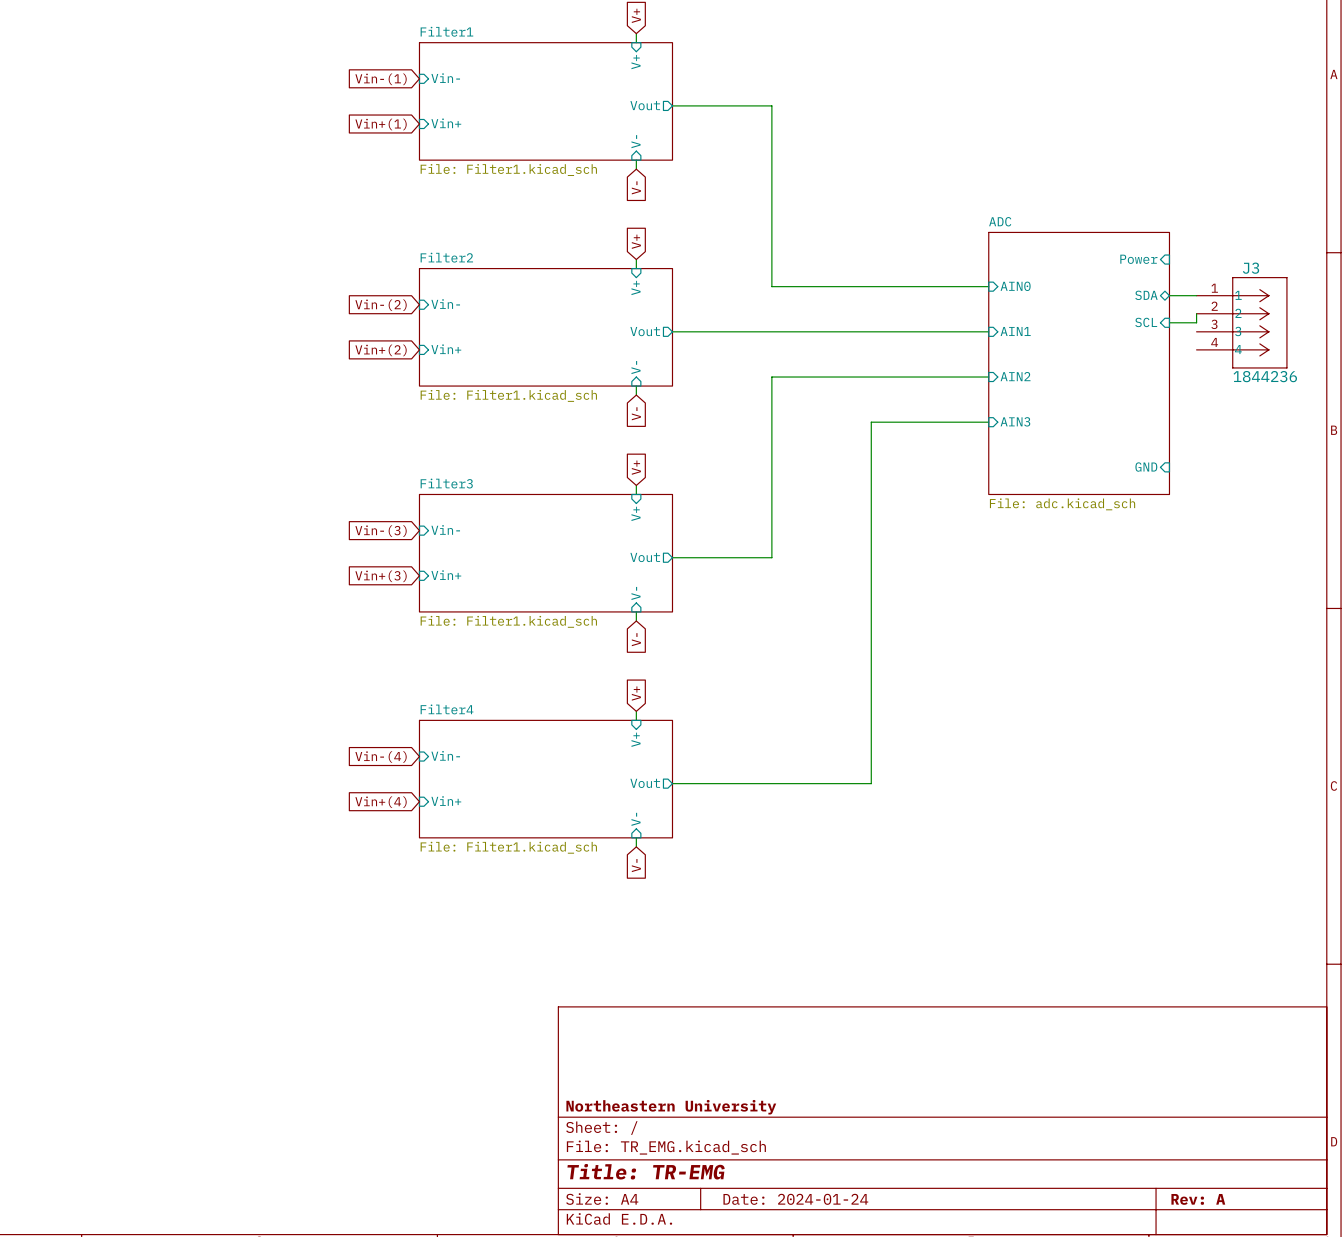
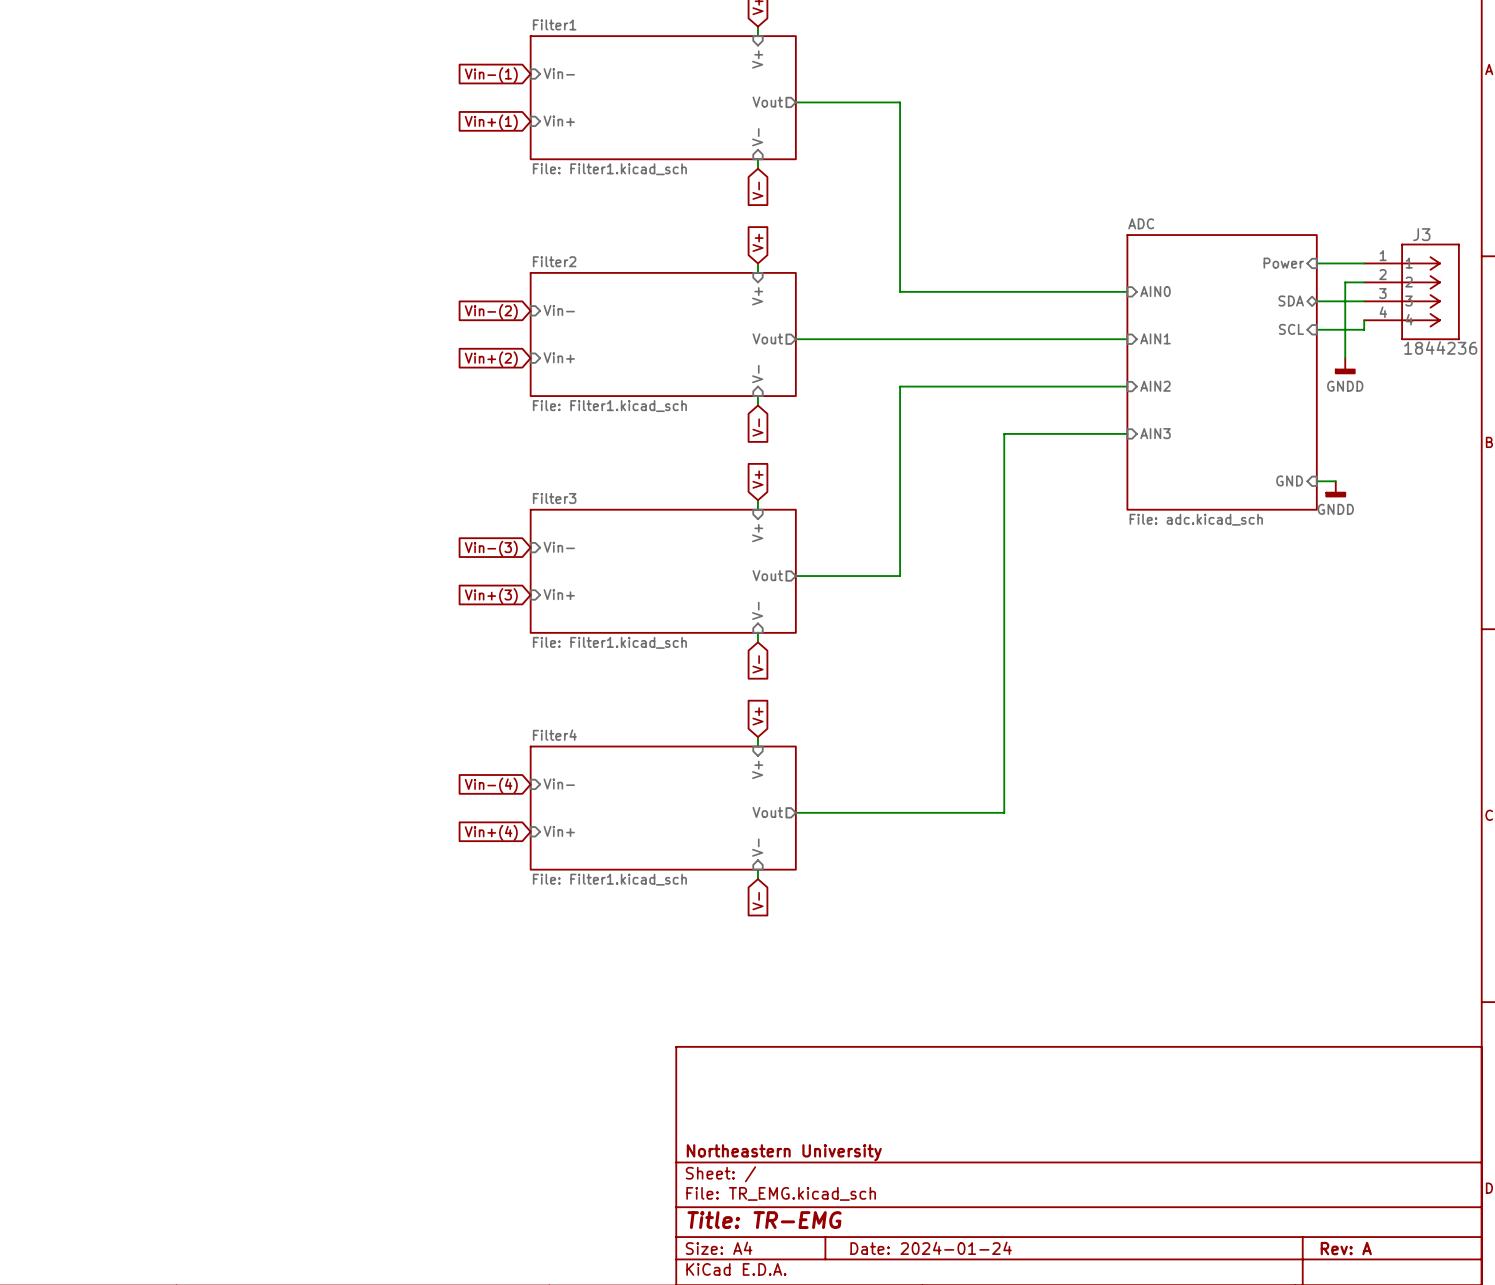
wire: none -> (1316, 263) (1364, 263)
wire: none -> (1364, 282) (1345, 282) (1345, 320)
wire: none -> (1364, 320) (1364, 329) (1345, 329) (1345, 358)
J3 position: (1241, 322) -> (1411, 291)
power symbol: none -> GNDD (1345, 366)
wire: none -> (1316, 481) (1335, 481)
power symbol: none -> GNDD (1335, 489)

